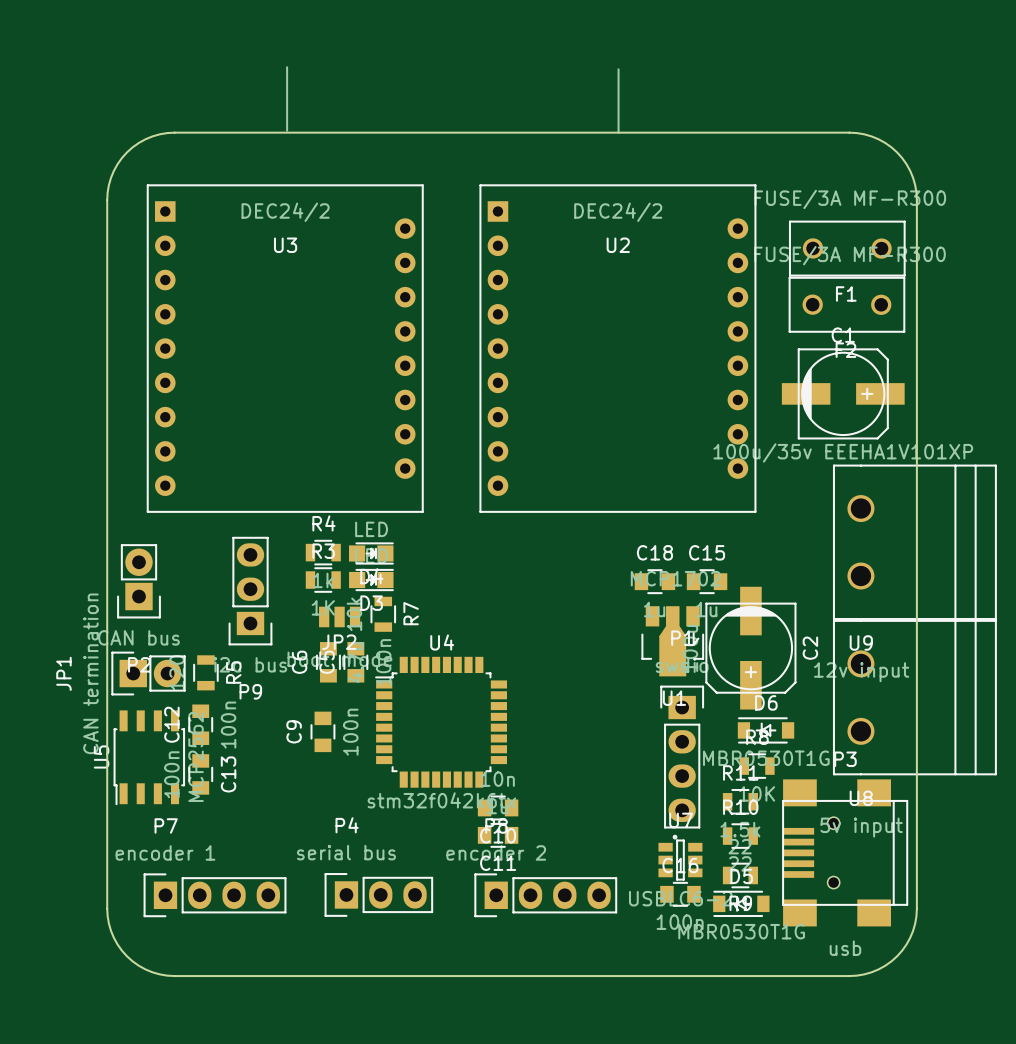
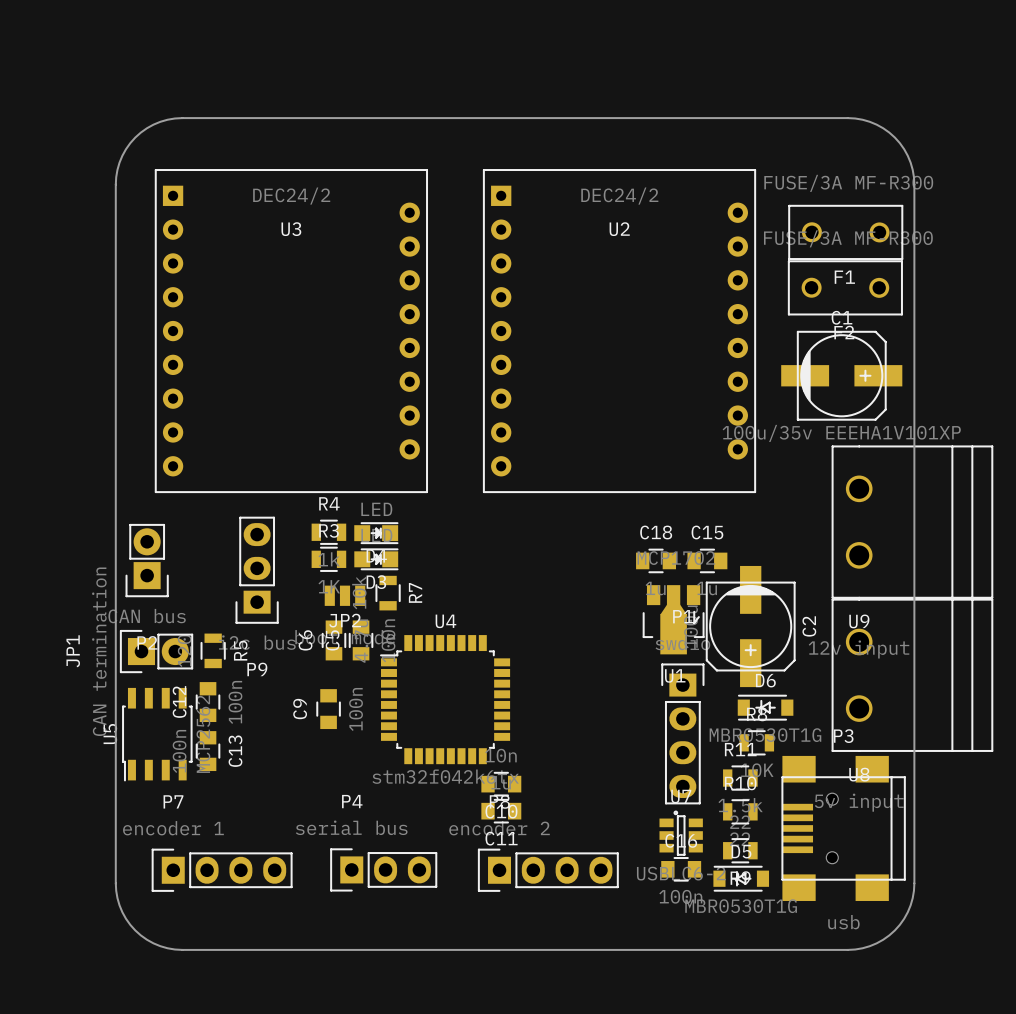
part: (287, 98) -> none
part: (618, 101) -> none

